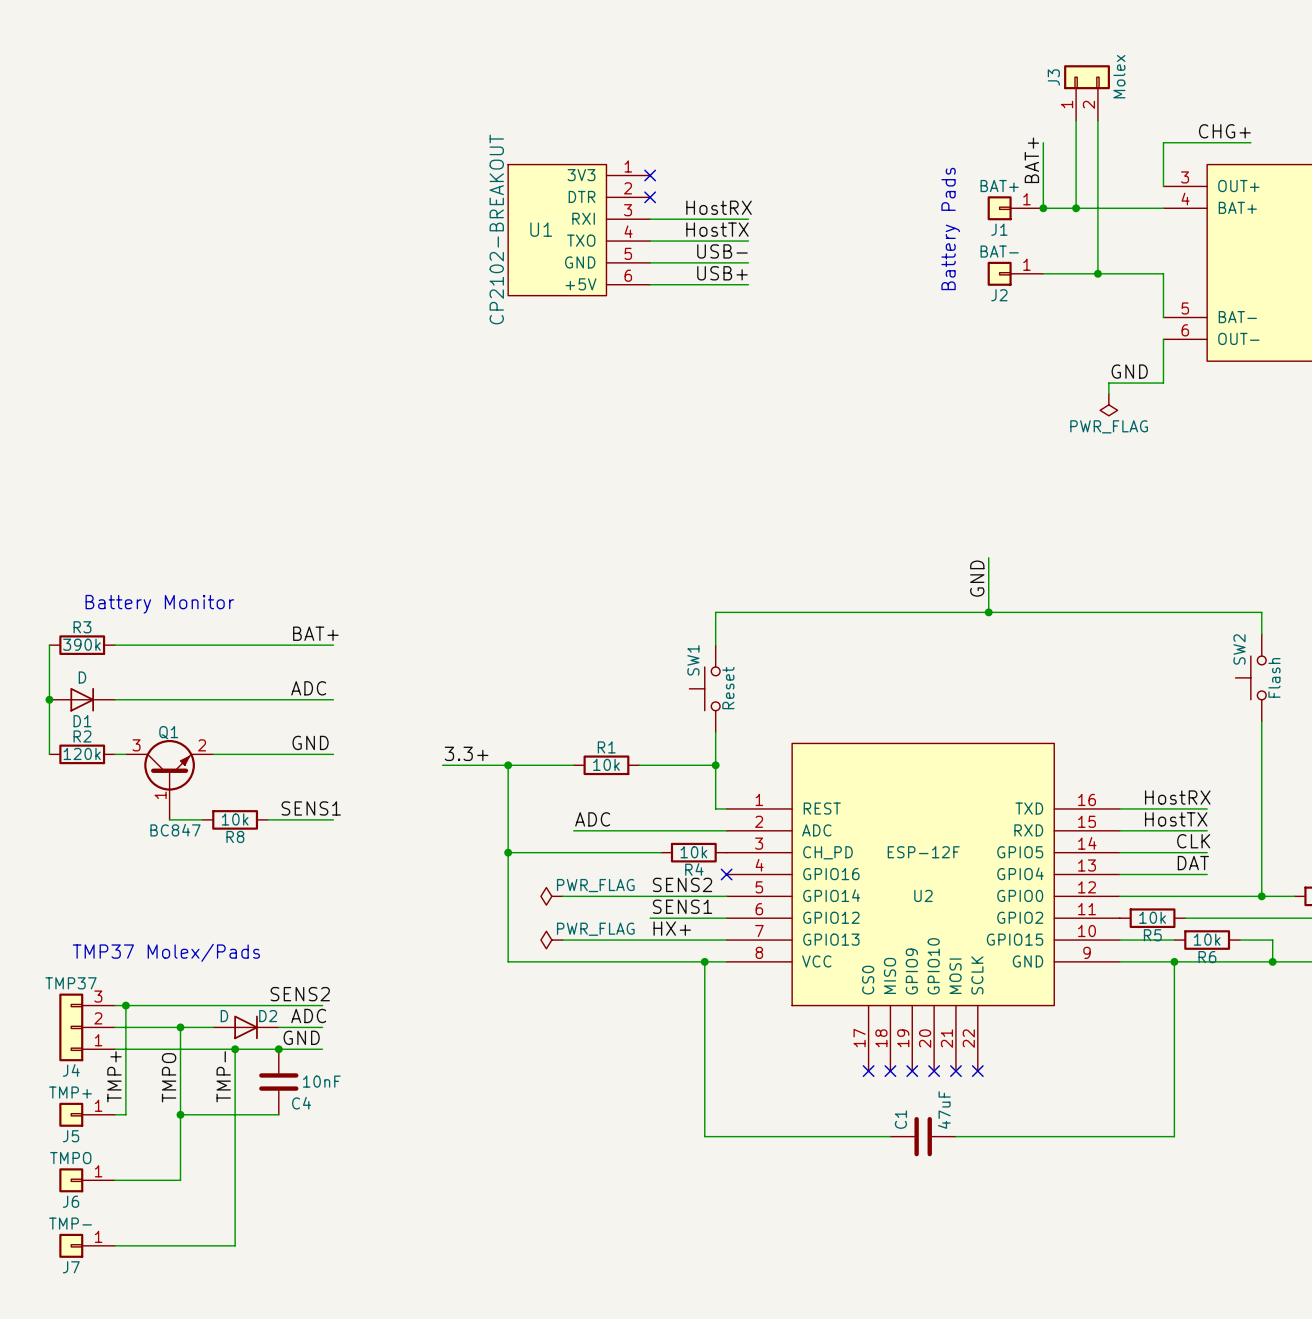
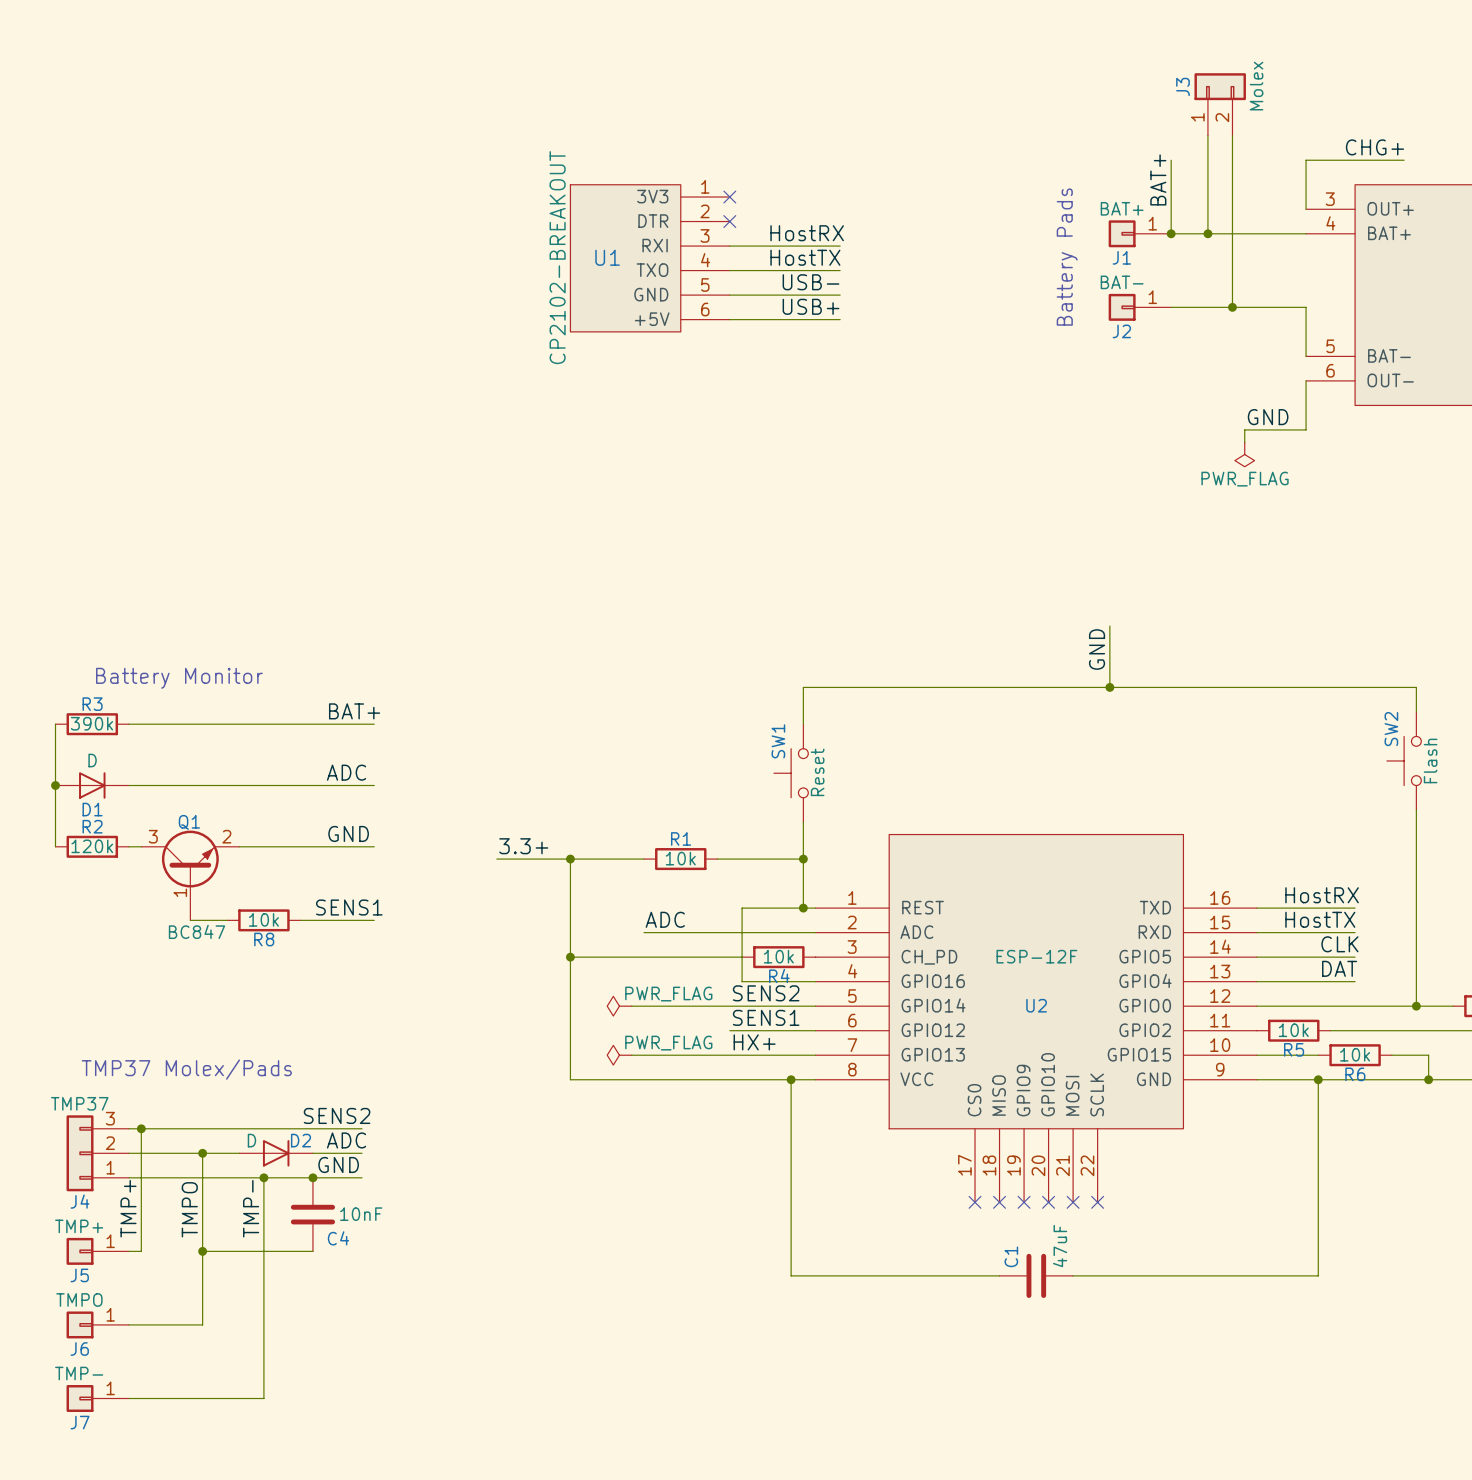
wire: none -> (803, 908) (742, 908) (742, 981) (815, 981)
junction: none -> (803, 908)
no-connect mark: (726, 874) -> none

